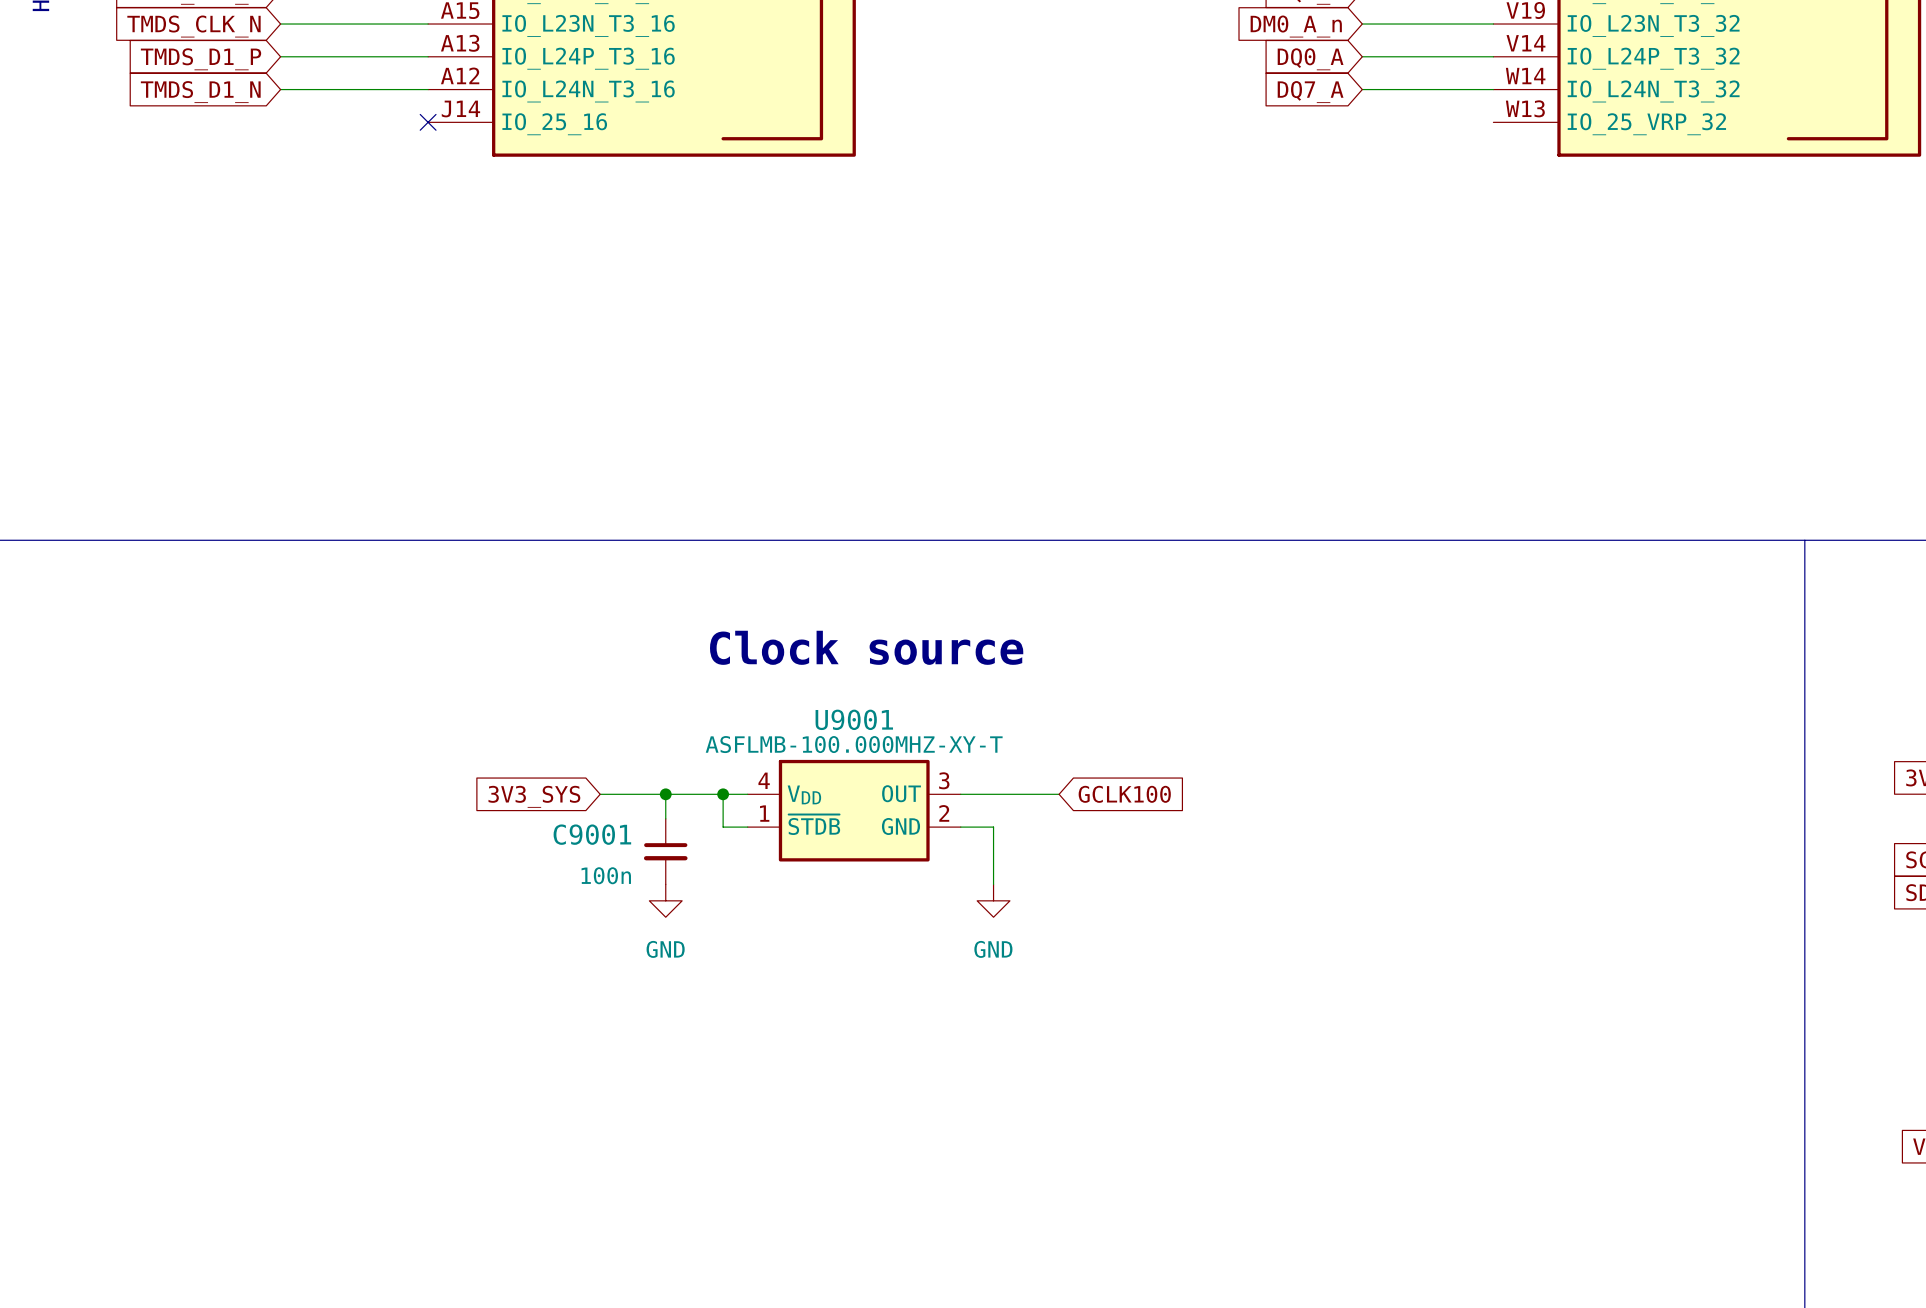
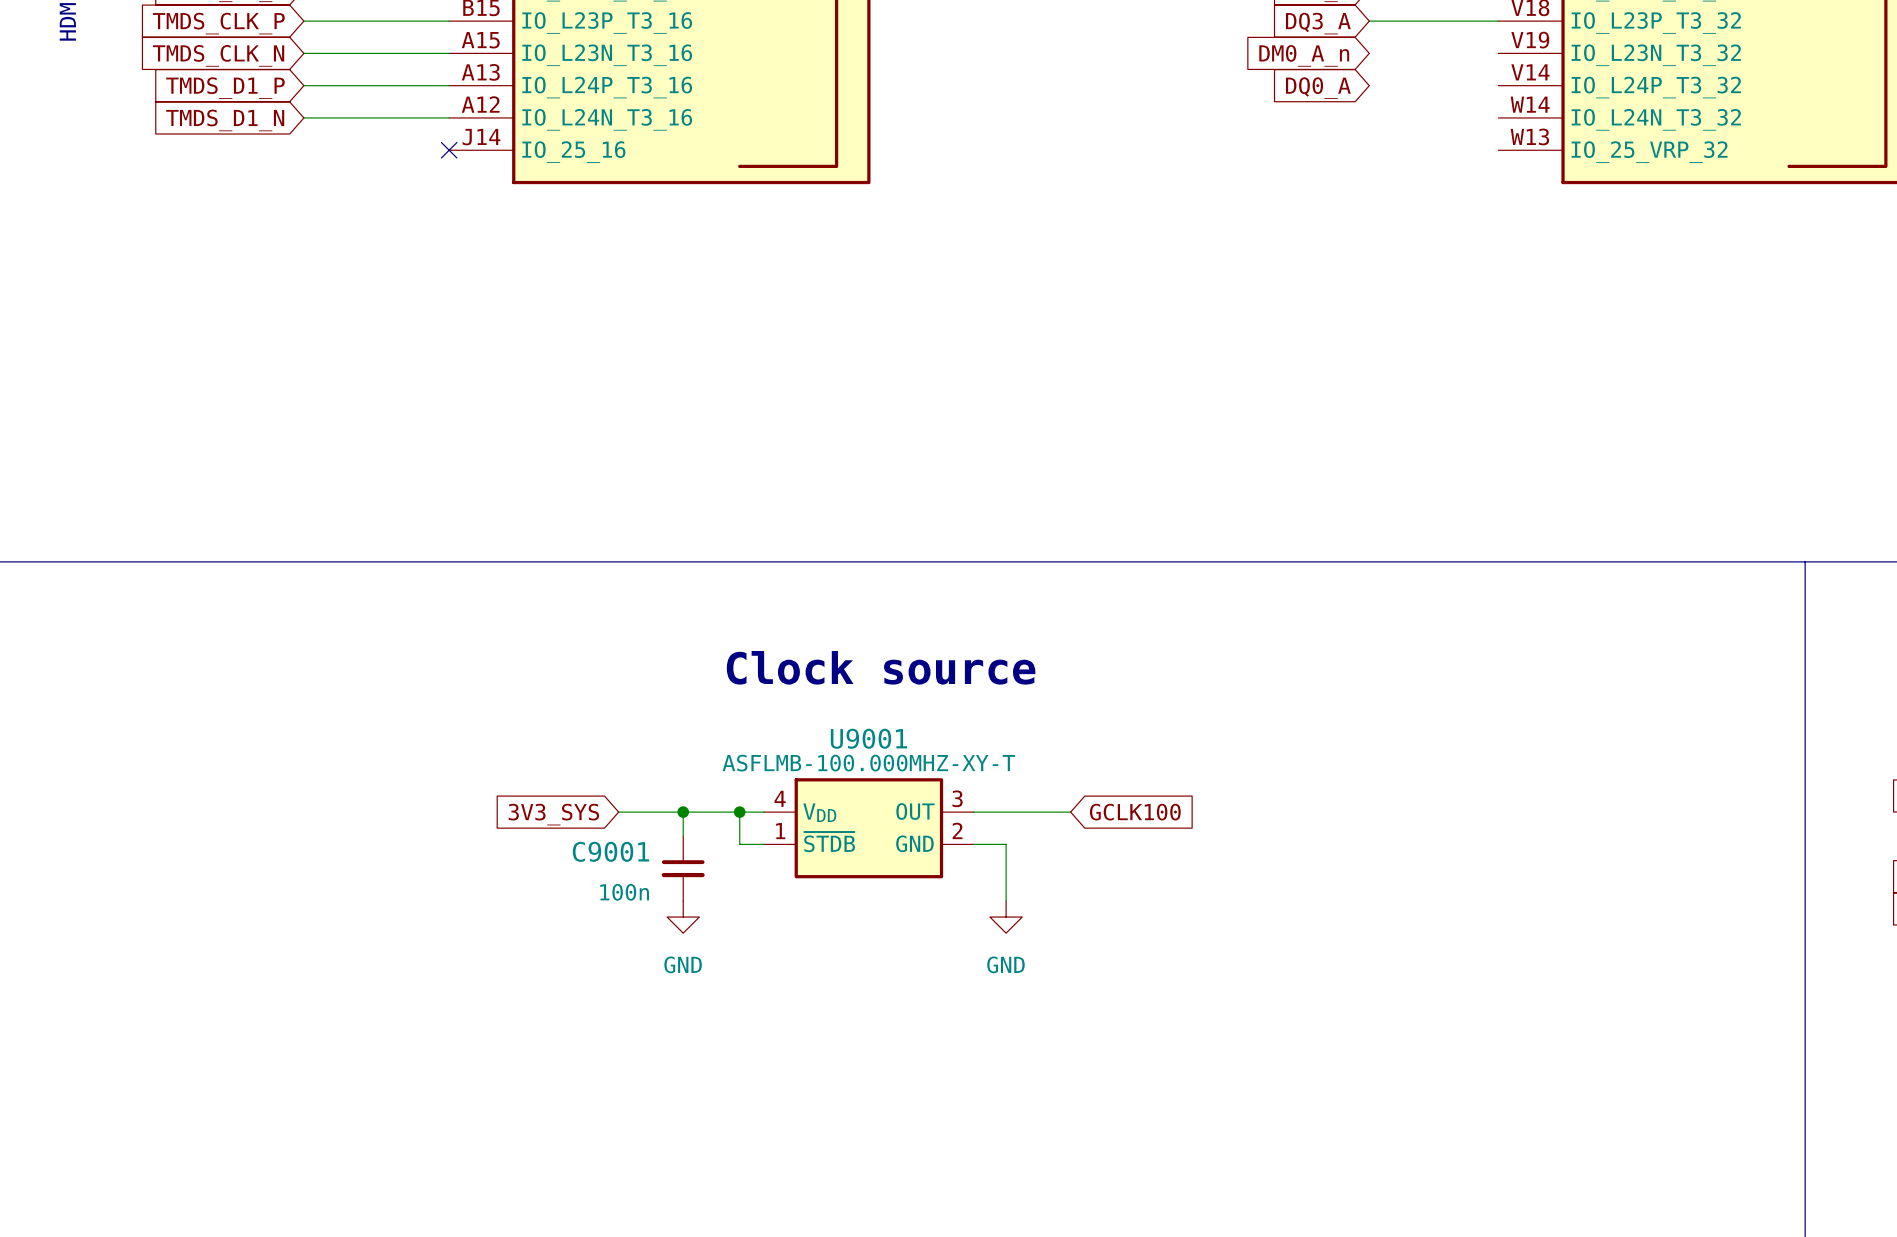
wire: (1362, 24) (1493, 24) -> none
wire: (1362, 56) (1493, 56) -> none
wire: (1362, 89) (1493, 89) -> none
global label: DQ7_A (1310, 92) -> none

